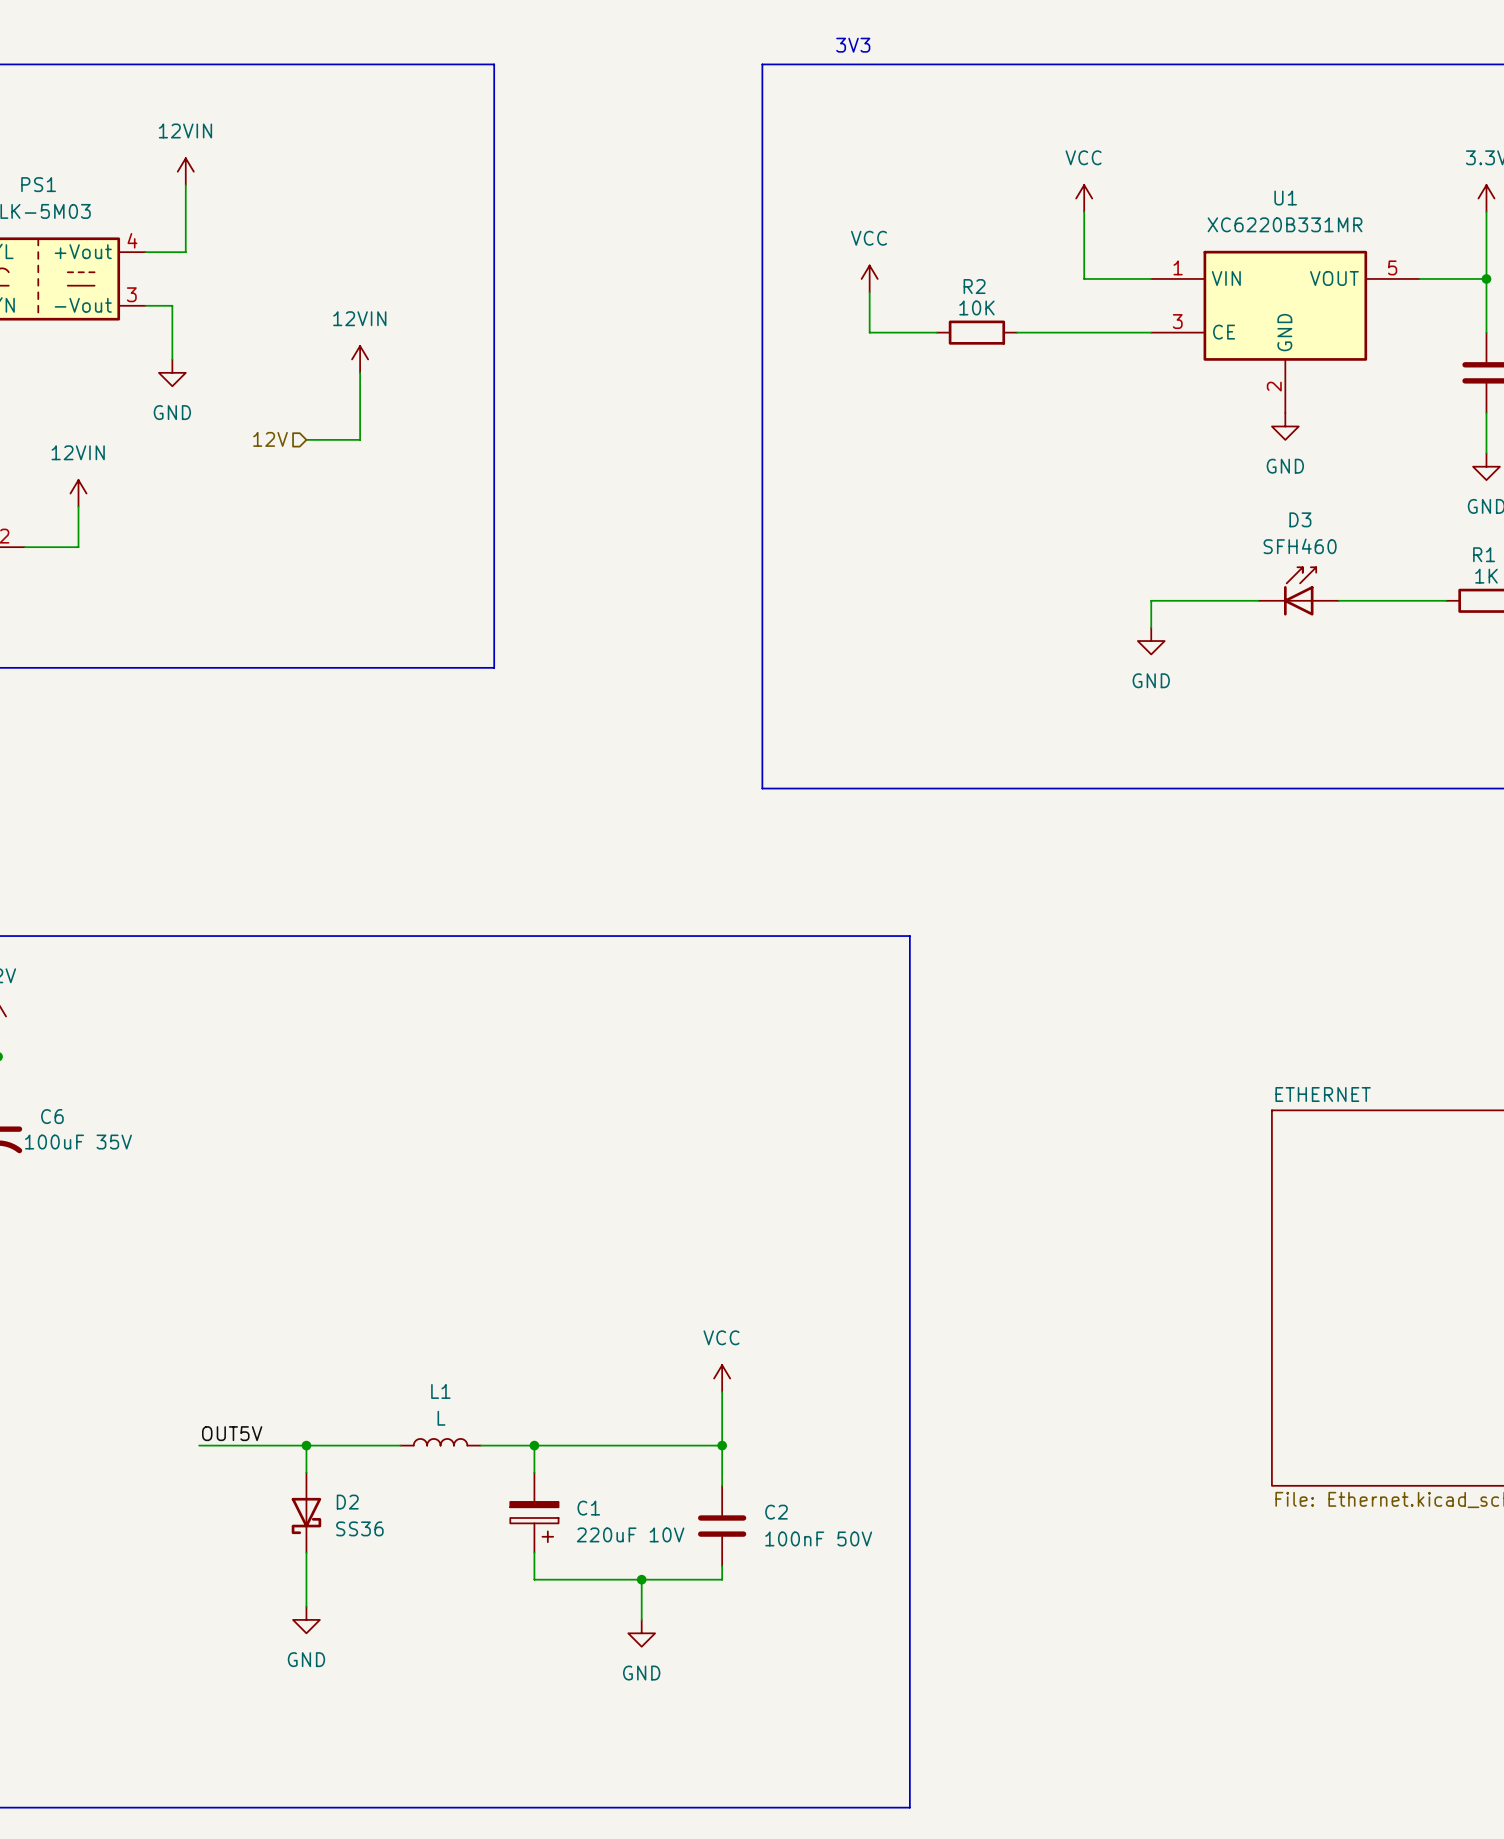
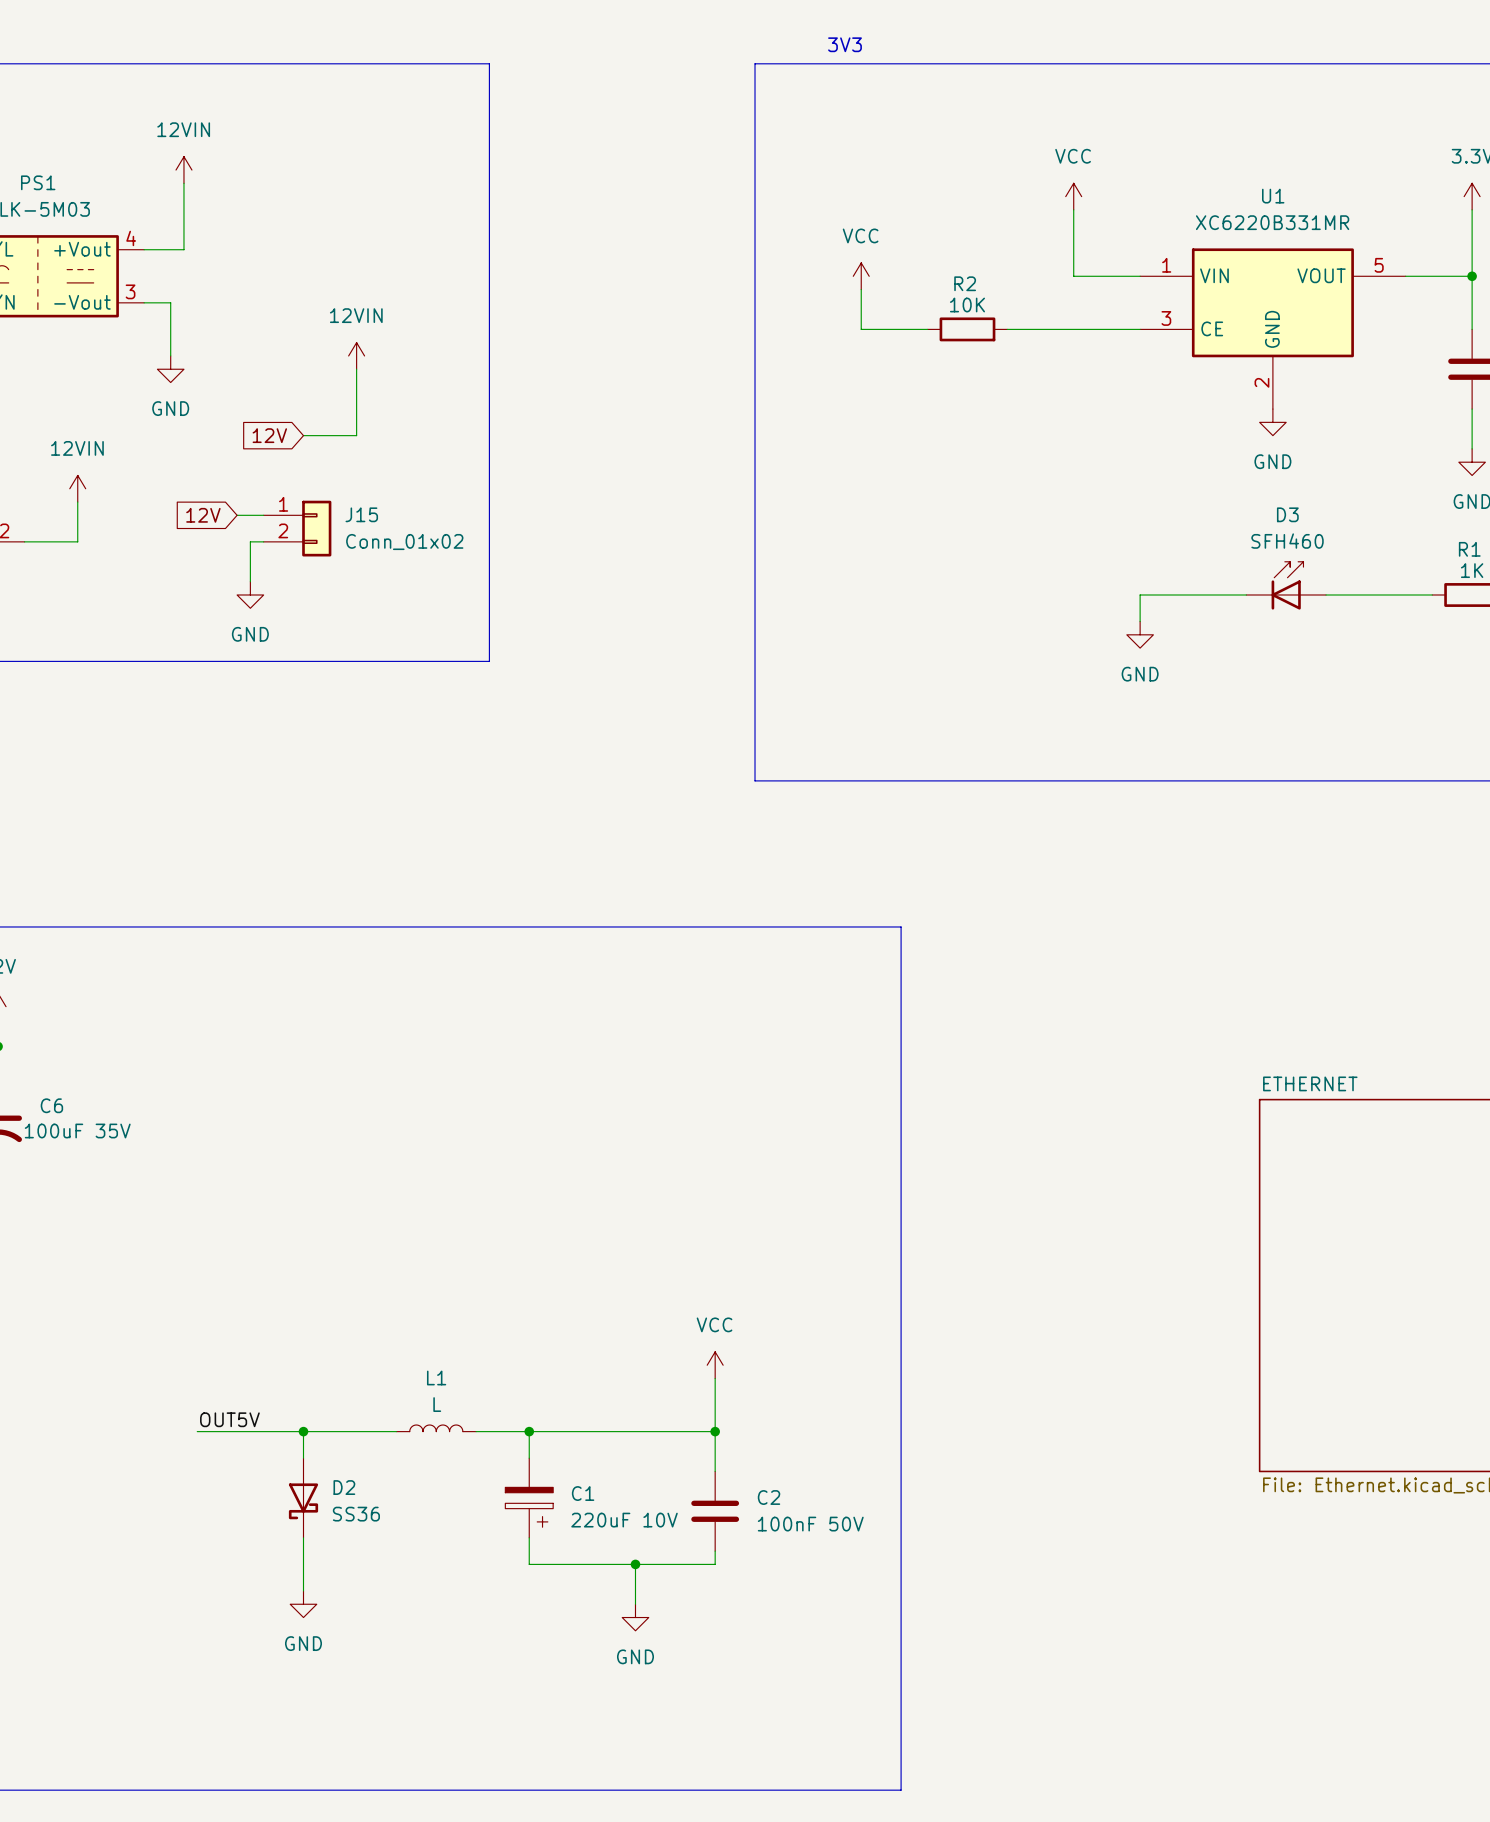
hierarchical label: 12V (270, 439) -> none
global label: none -> 12V (269, 435)
global label: none -> 12V (203, 515)
wire: none -> (237, 515) (263, 515)
J15: none -> Conn_01x02 (297, 528)
wire: none -> (263, 541) (250, 541) (250, 581)
power symbol: none -> GND (250, 594)

